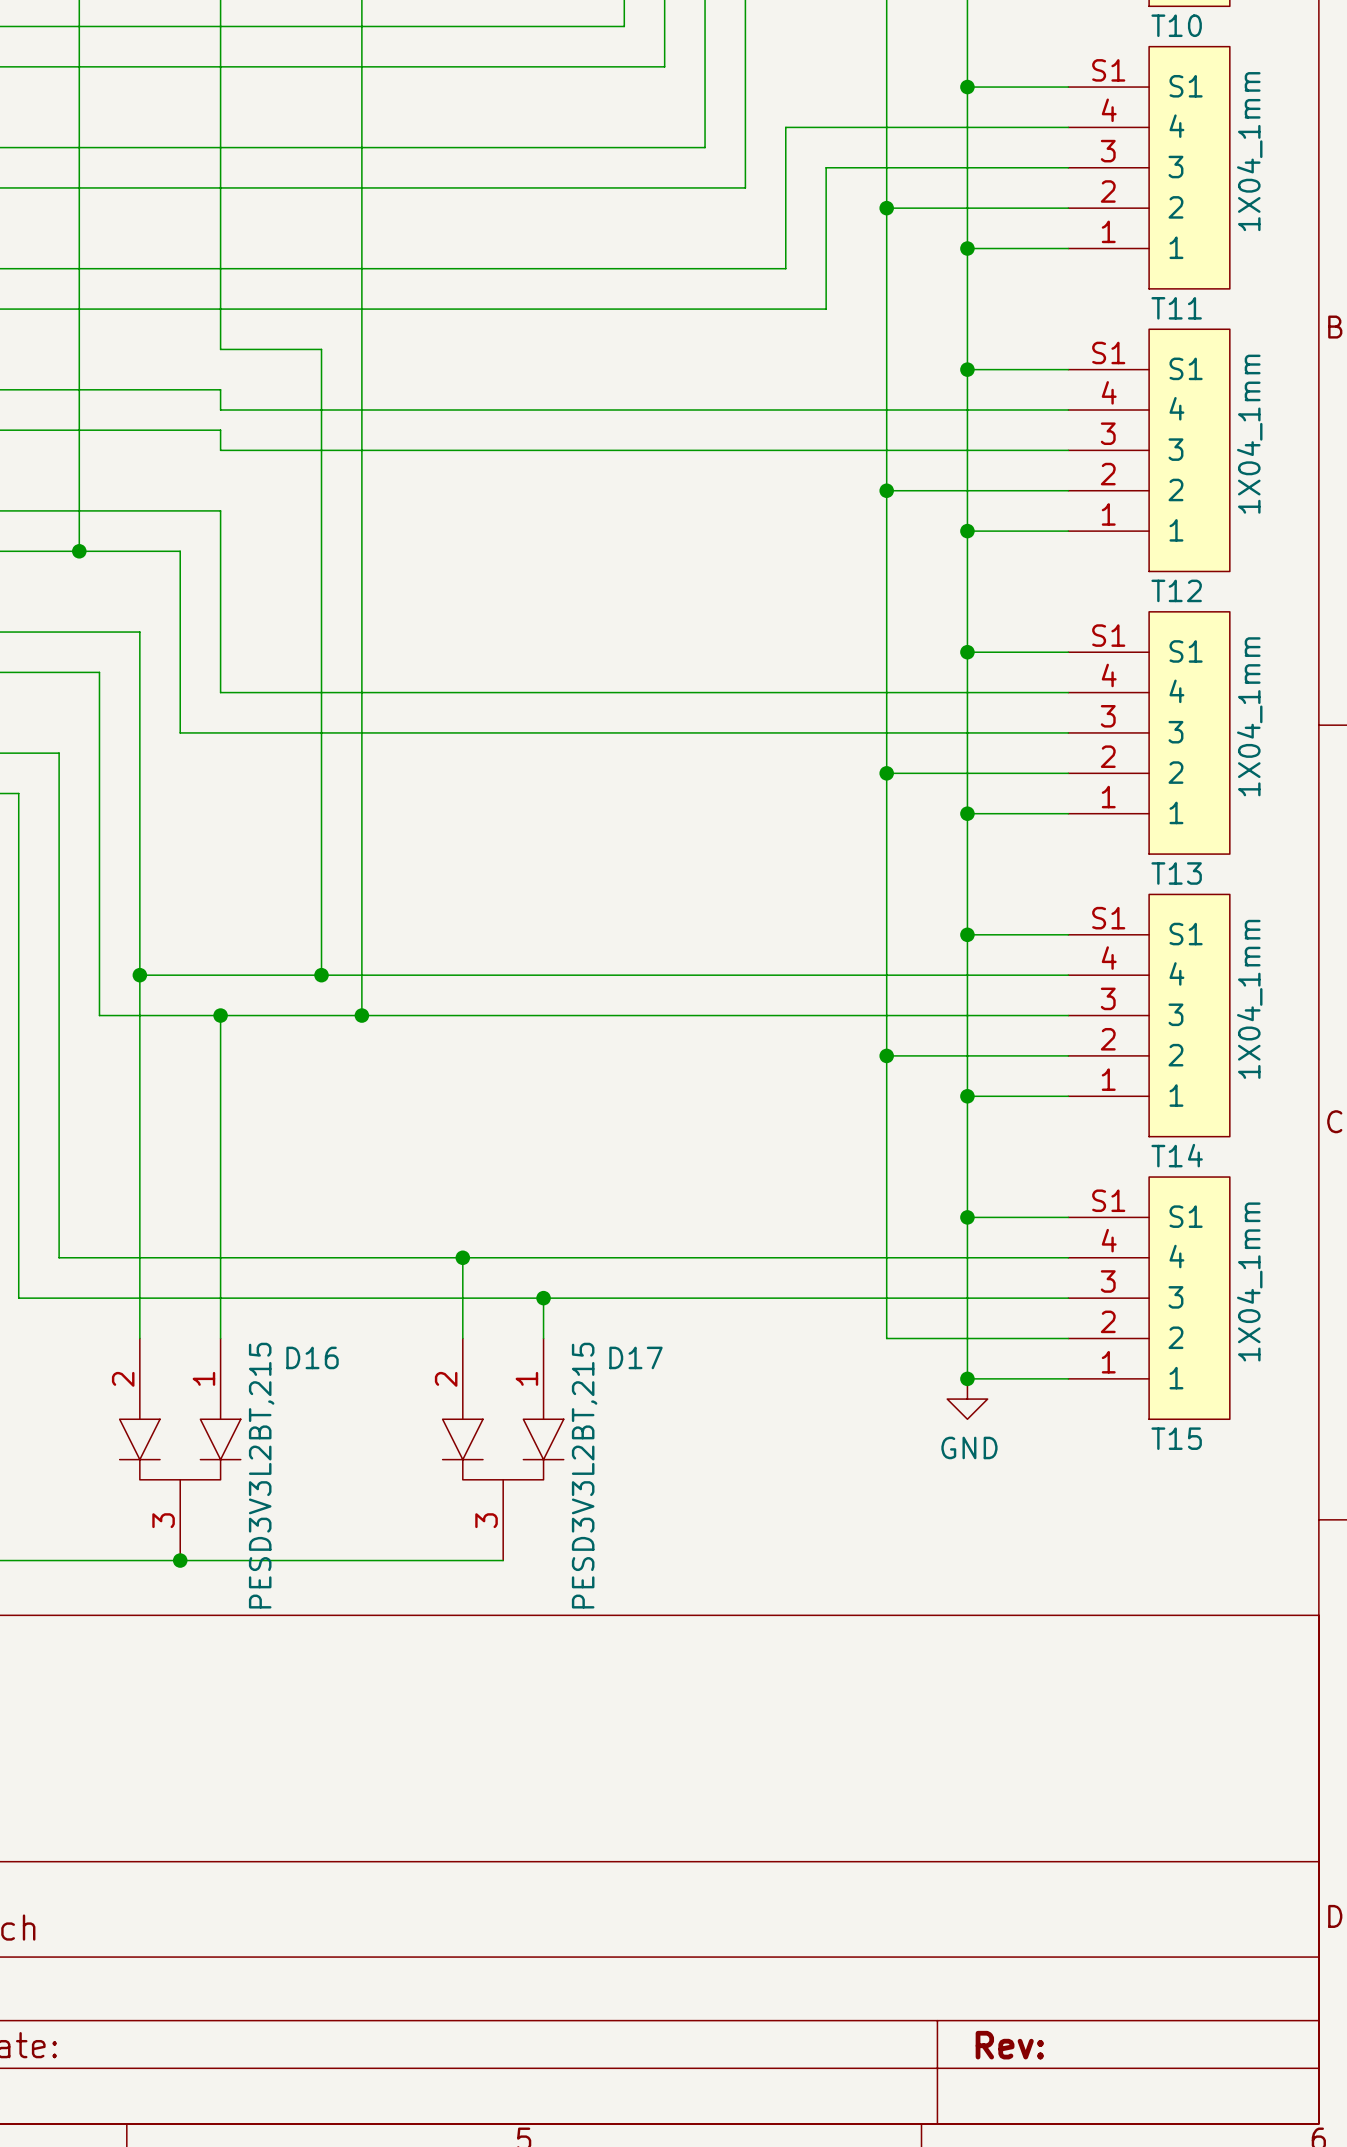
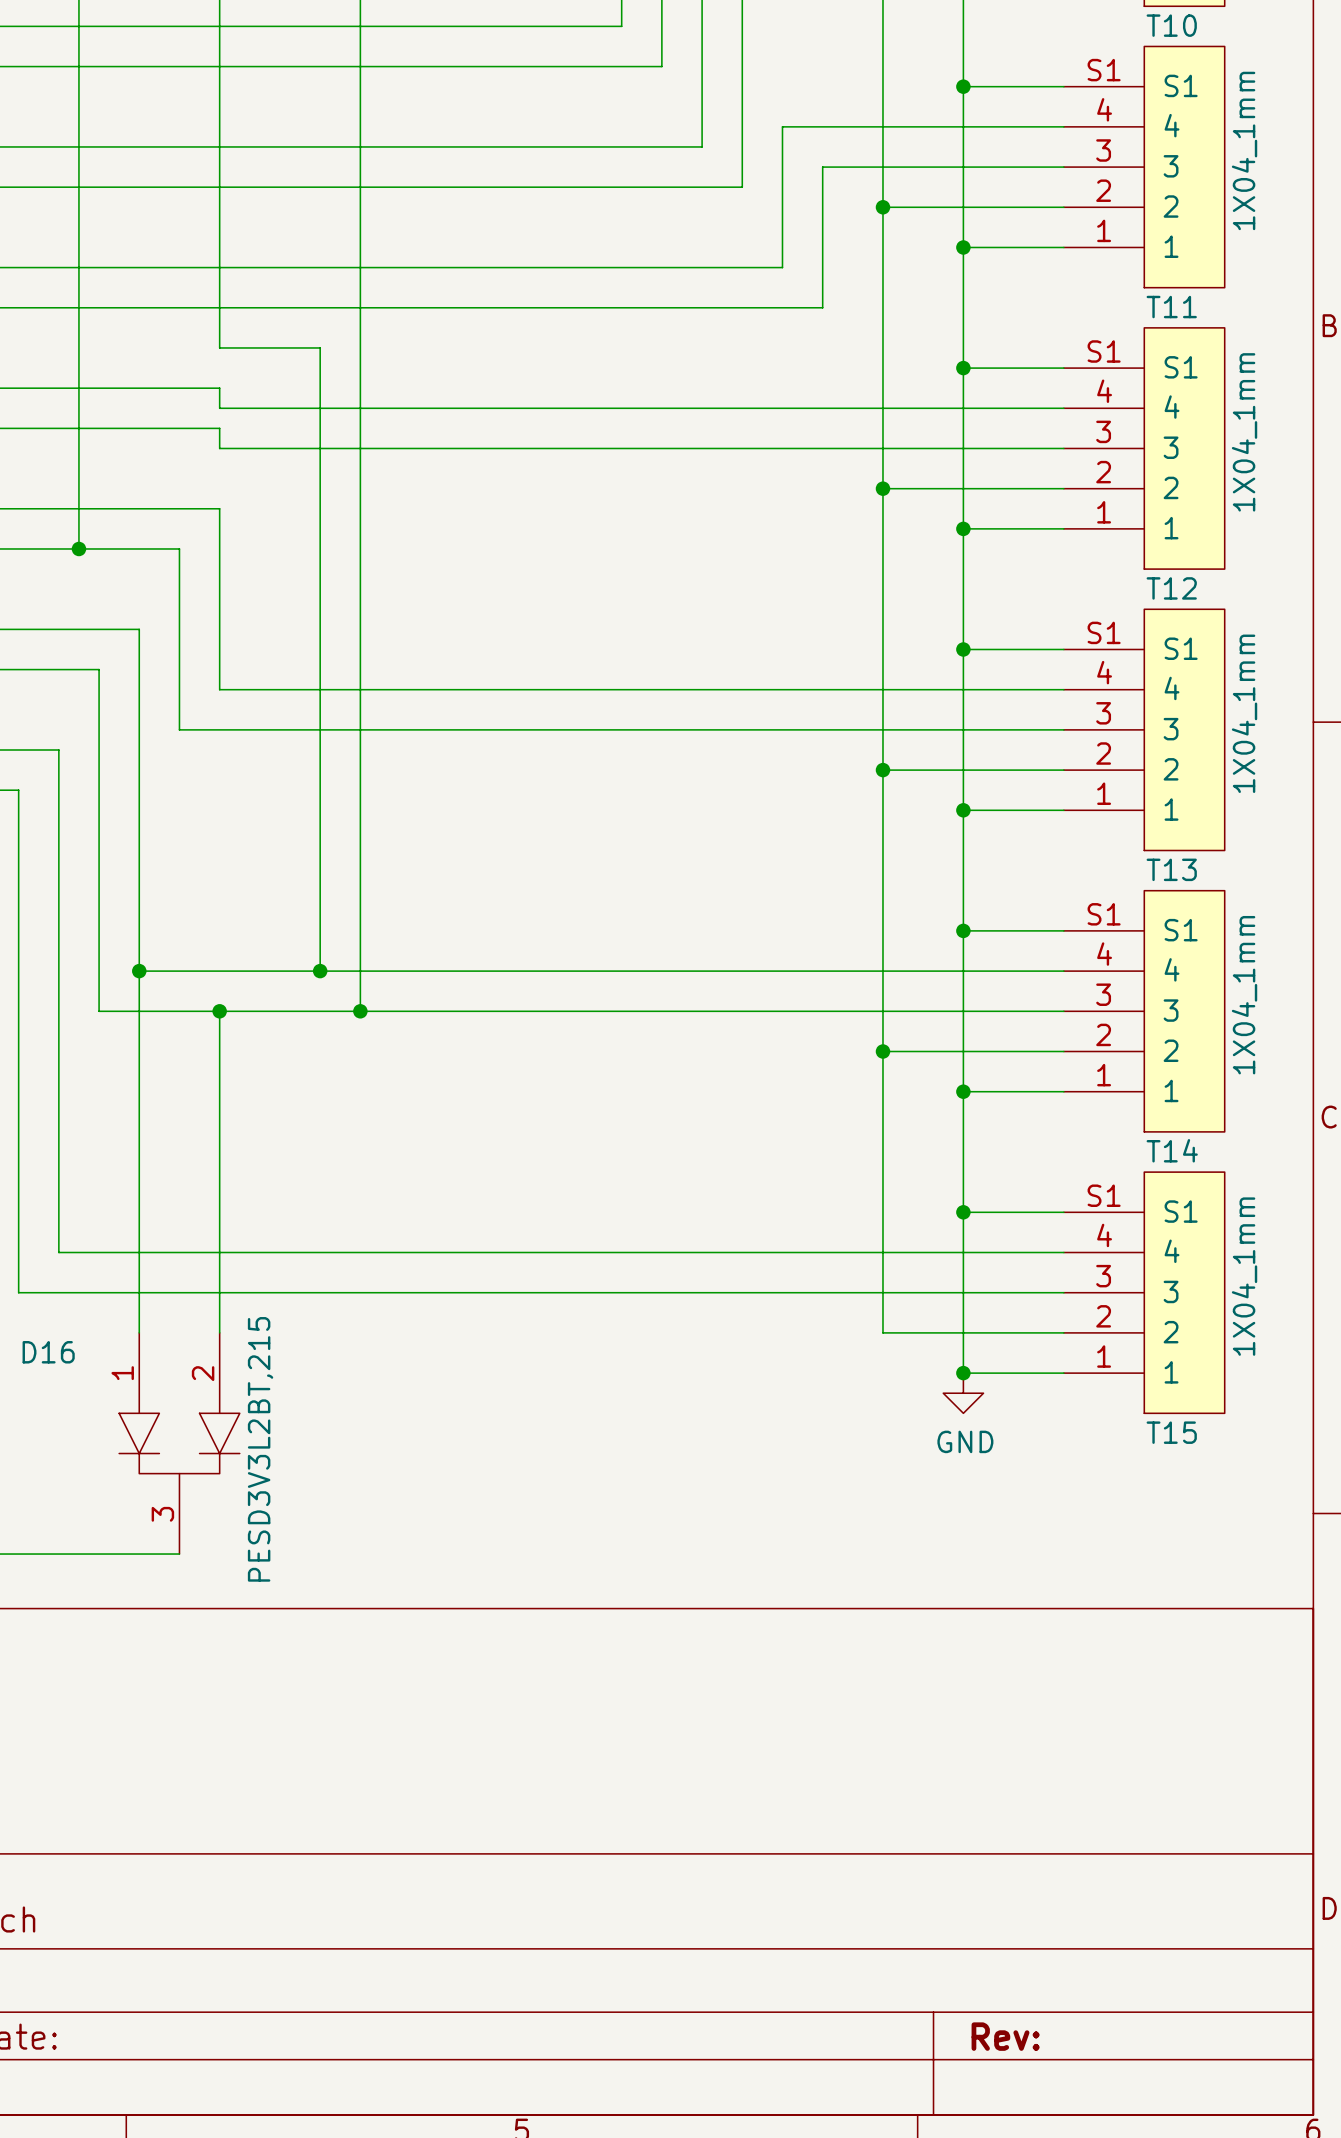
wire: (462, 1257) (462, 1338) -> none
junction: (462, 1257) -> none
wire: (543, 1298) (543, 1338) -> none
junction: (543, 1298) -> none
D16 flip: as is (180, 1449) -> left-right (179, 1443)
D17: (503, 1449) -> none
wire: (180, 1560) (503, 1560) -> none
junction: (180, 1560) -> none

